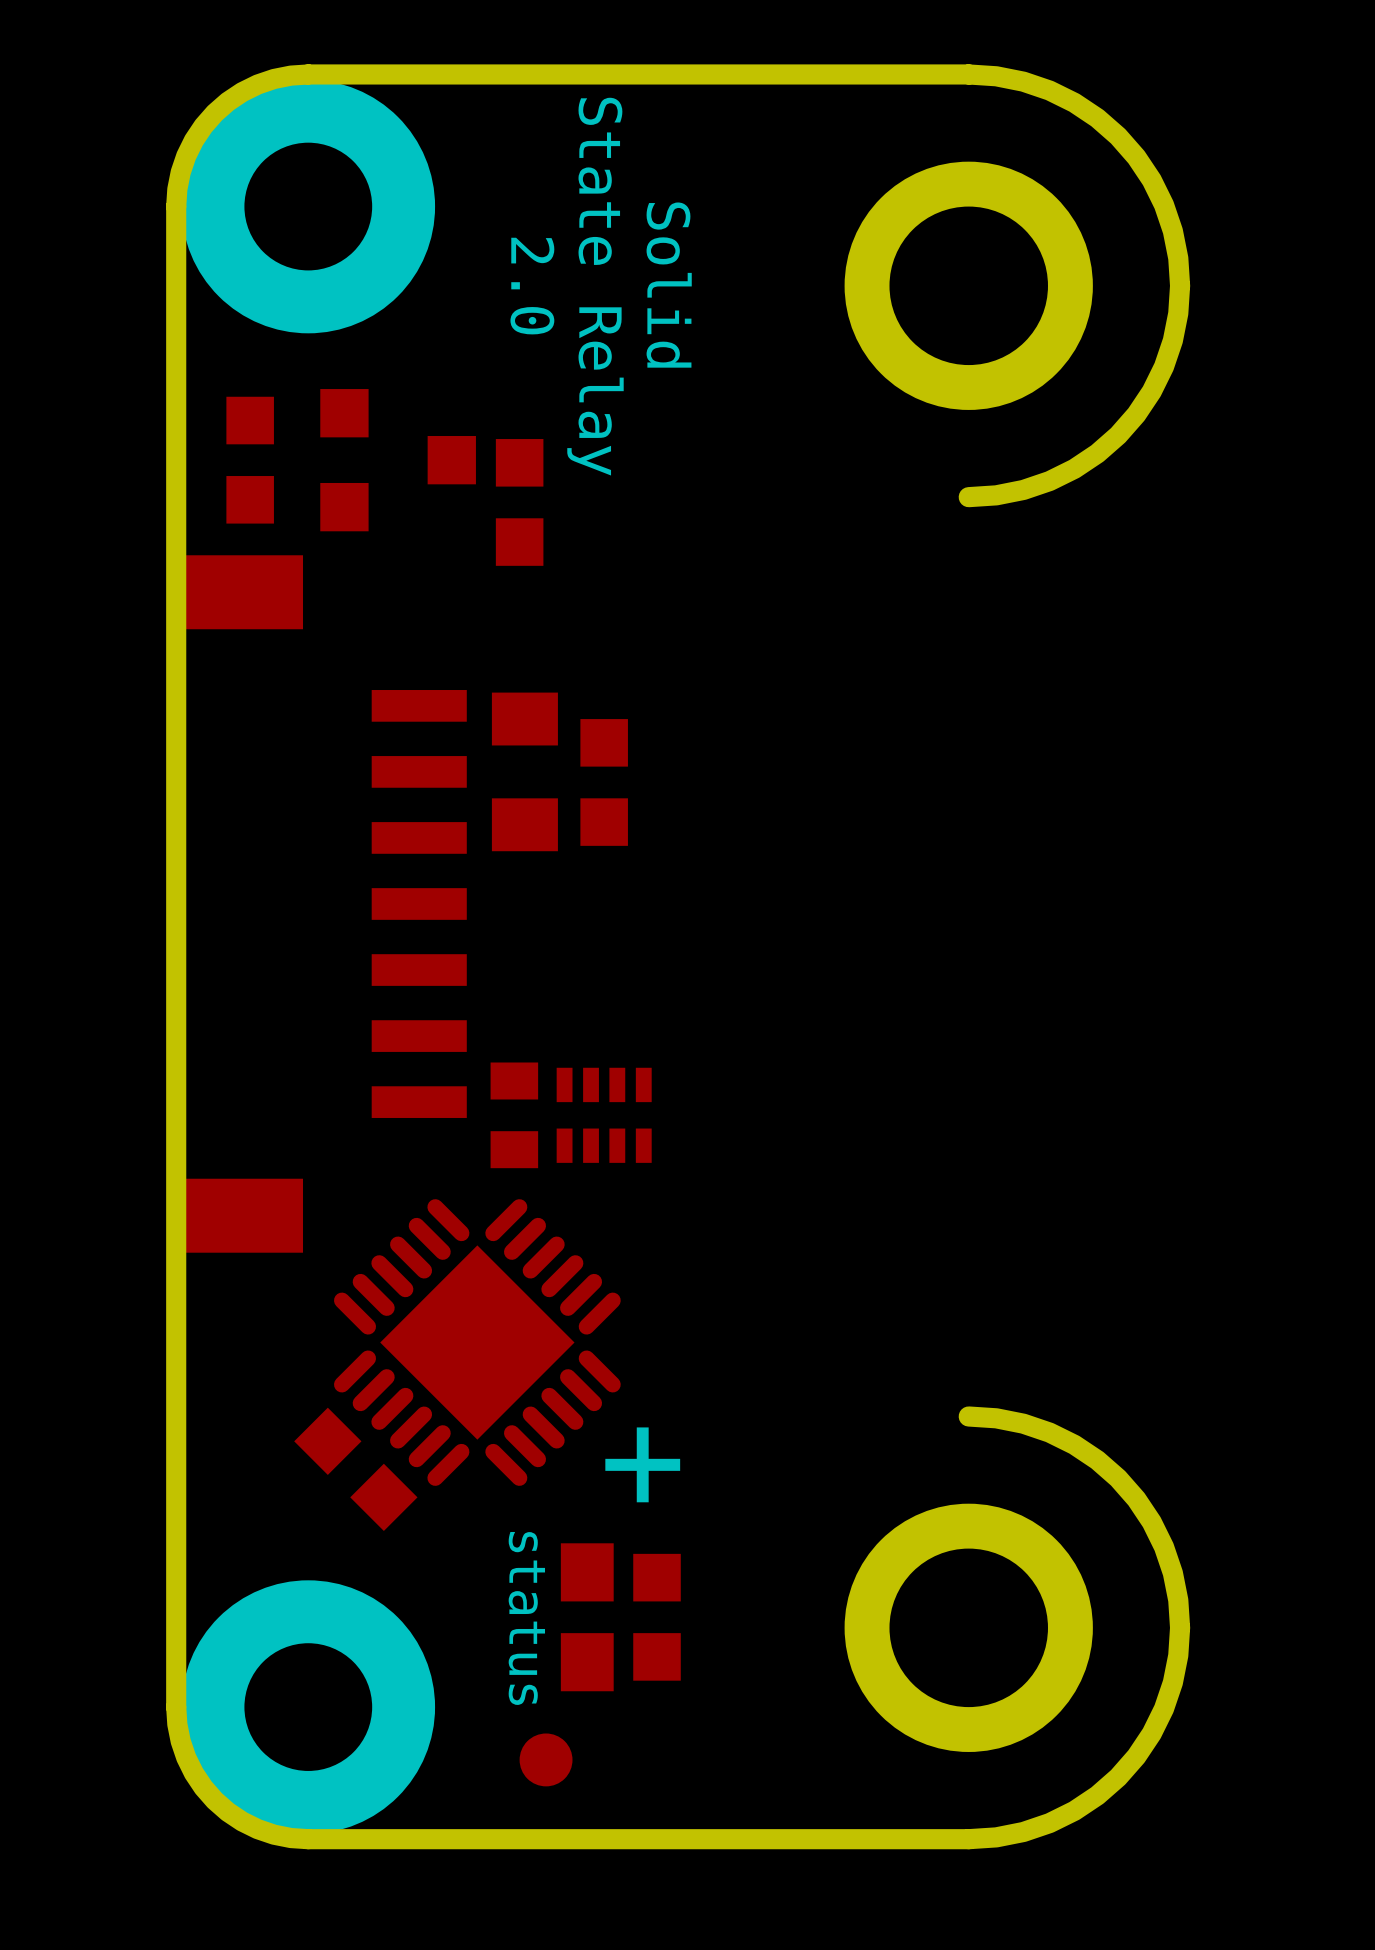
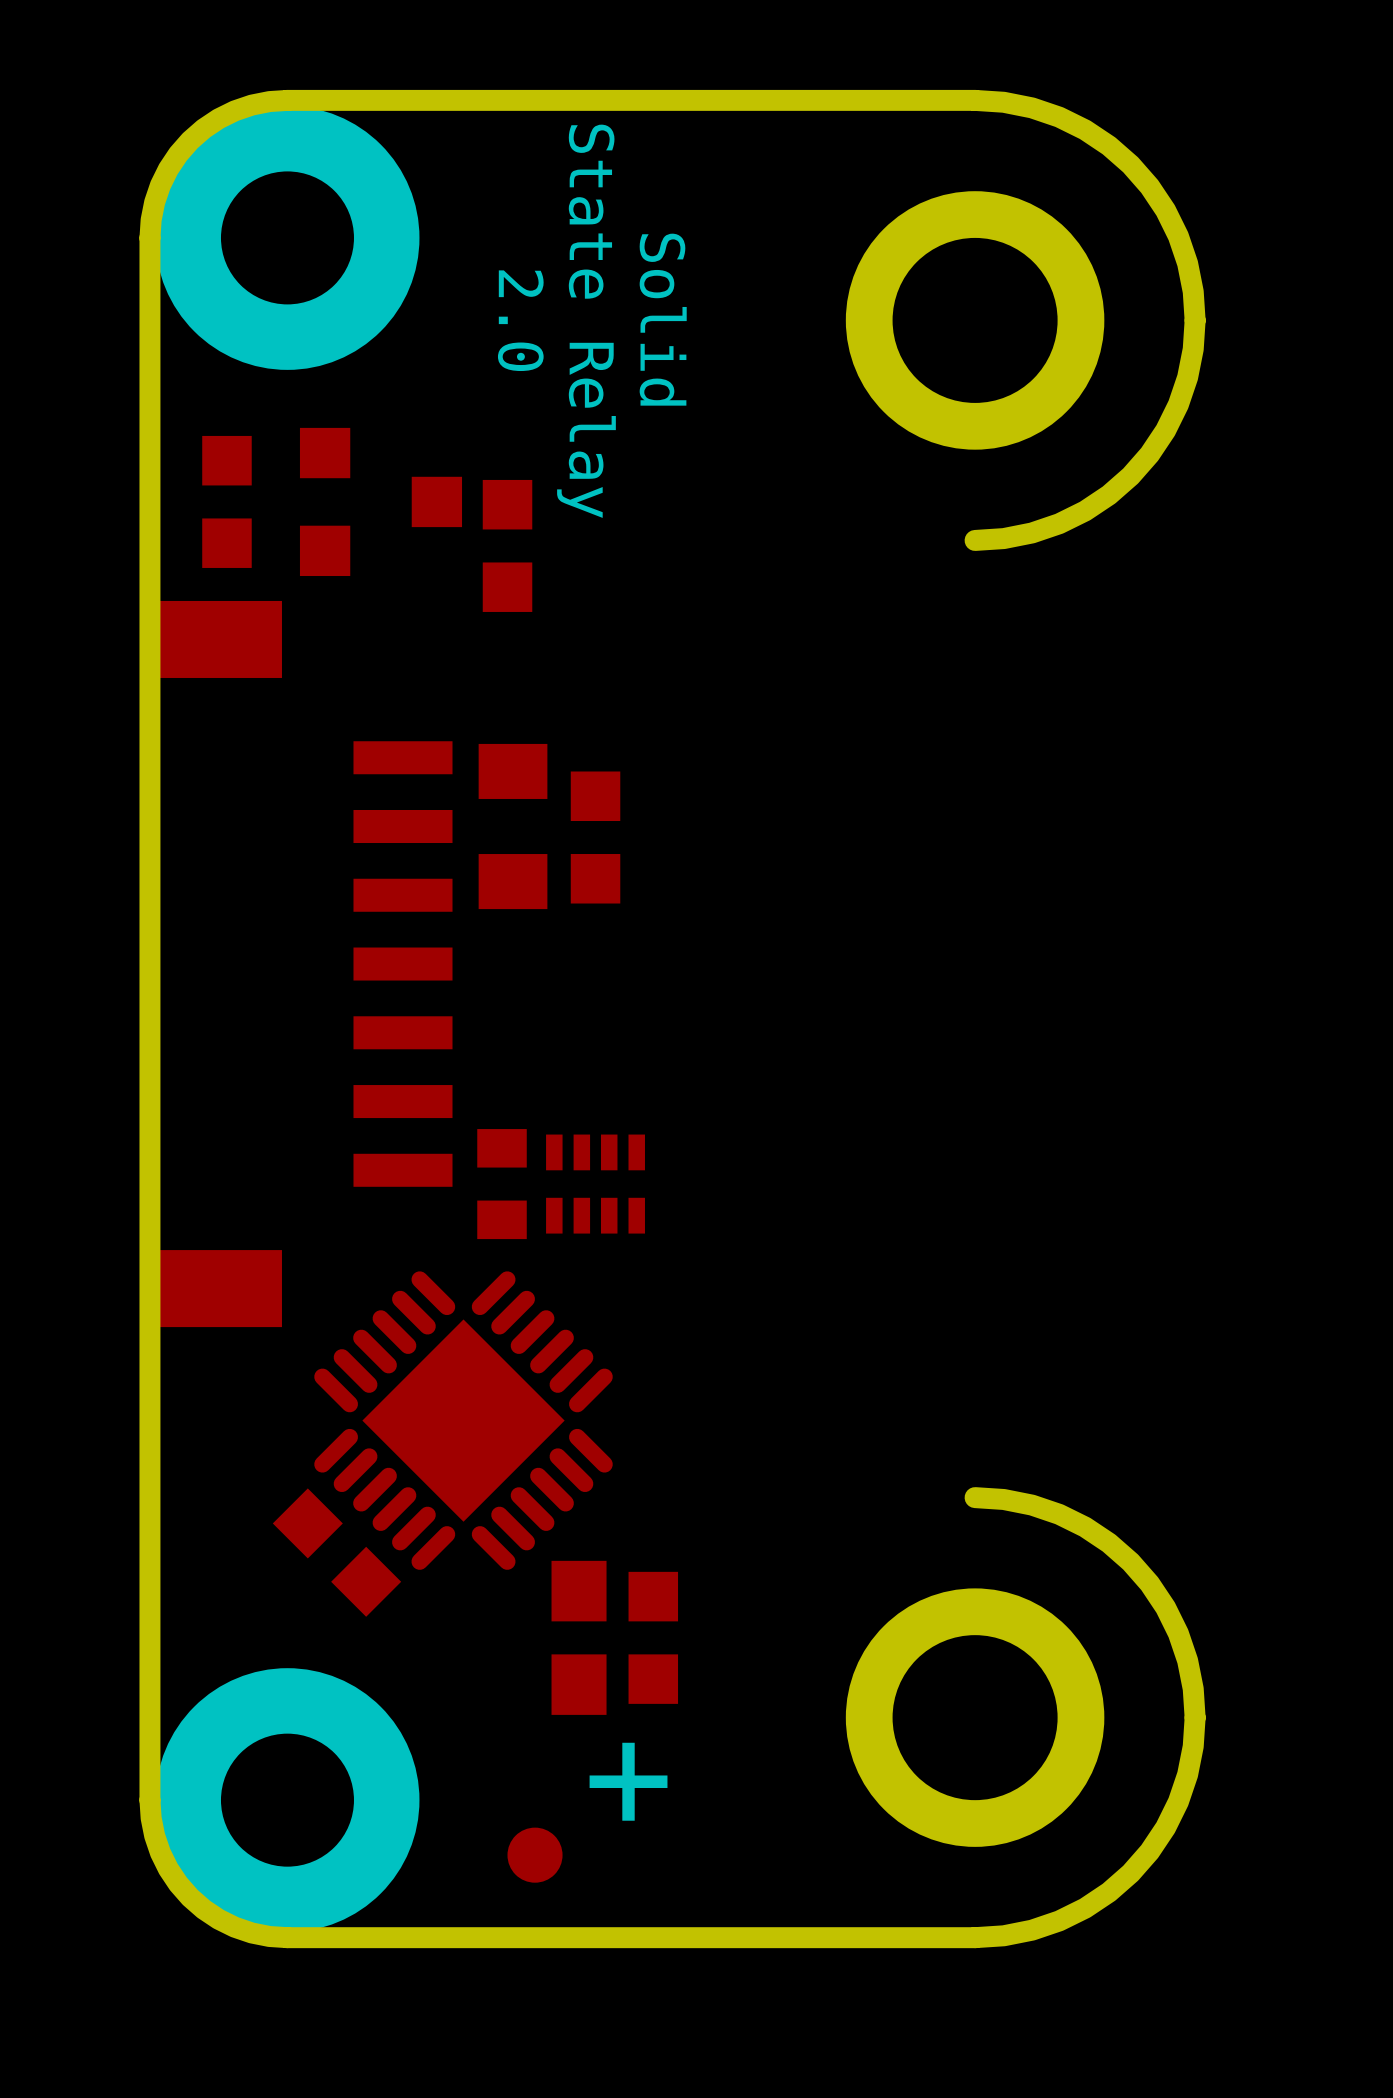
text position: + (642, 1464) -> + (628, 1781)
part position: (587, 1617) -> (579, 1637)
part position: (657, 1617) -> (653, 1637)
text: status (526, 1618) -> none

